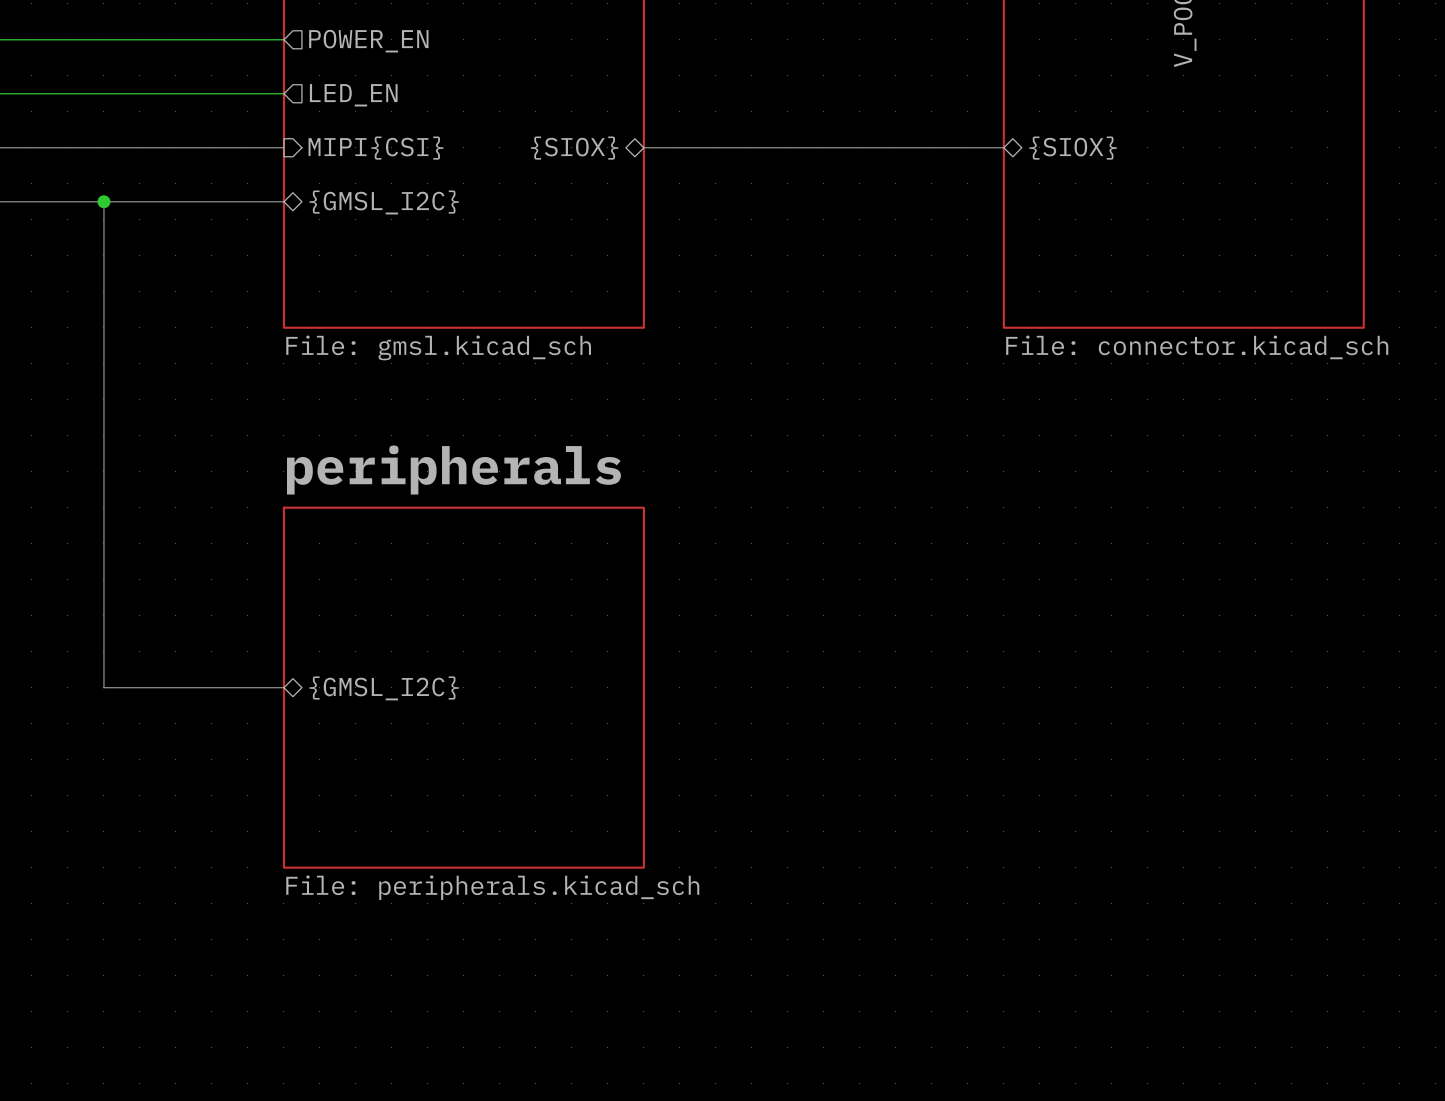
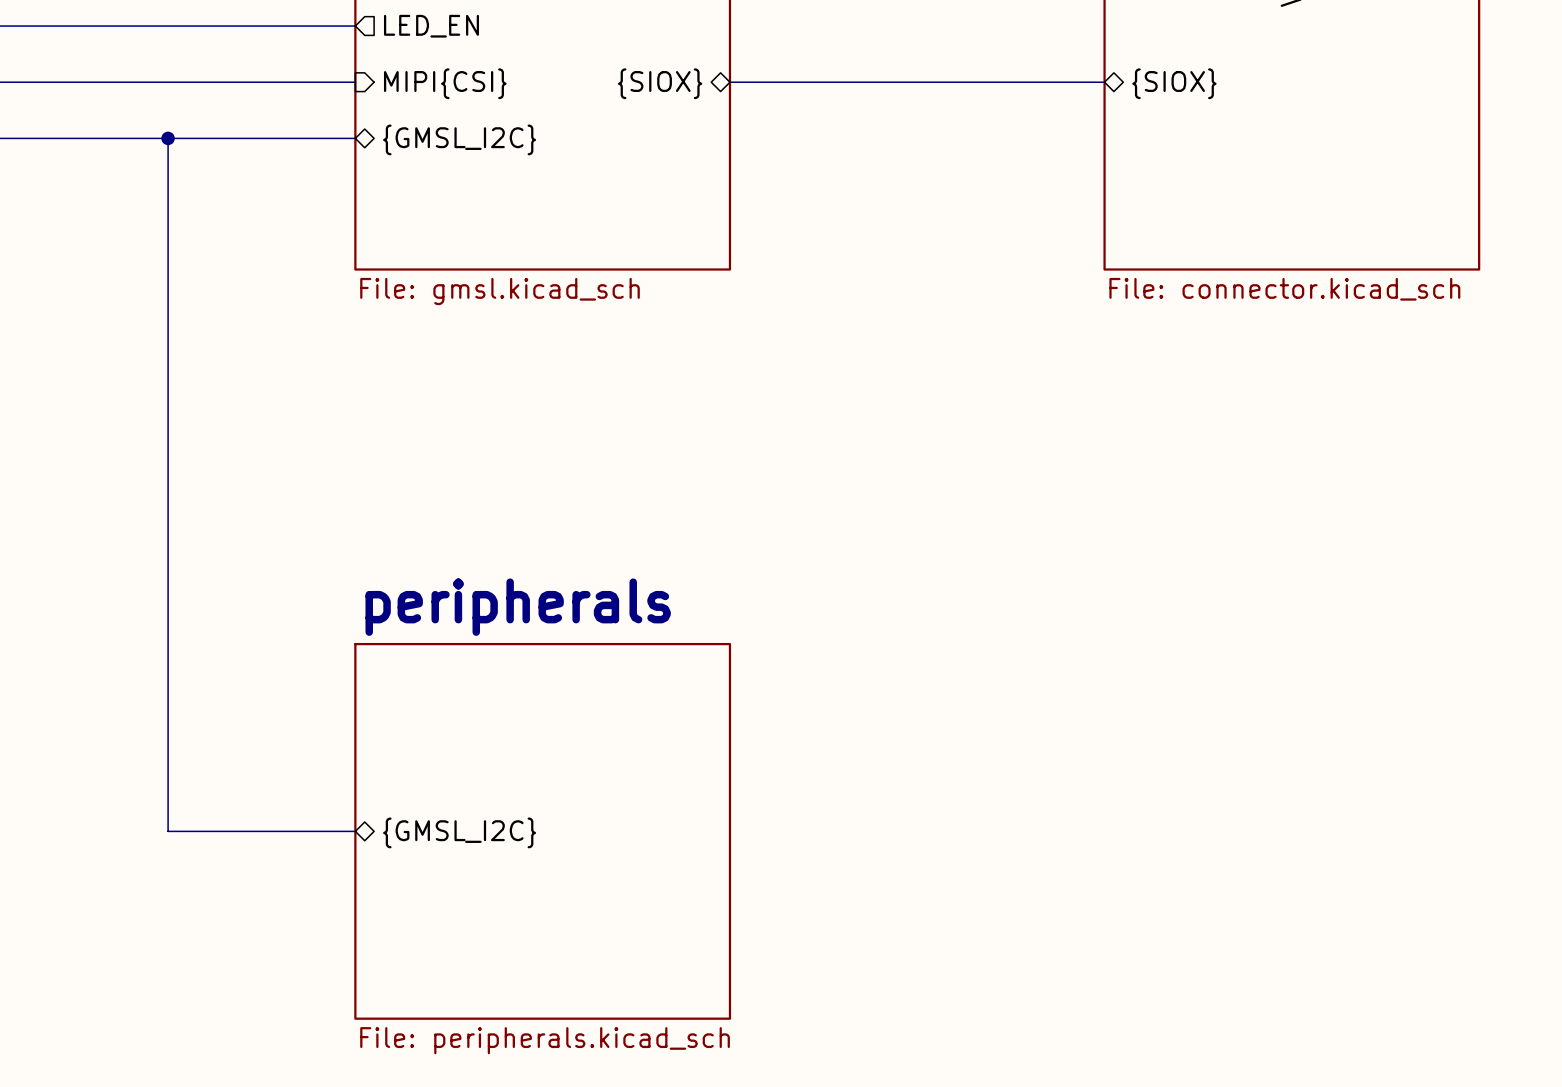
bus: (103, 687) (283, 687) -> (168, 644) (168, 831) (355, 831)
sheet peripherals position: (463, 687) -> (542, 831)
sheet pin position: {GMSL_I2C} (384, 688) -> {GMSL_I2C} (459, 832)

